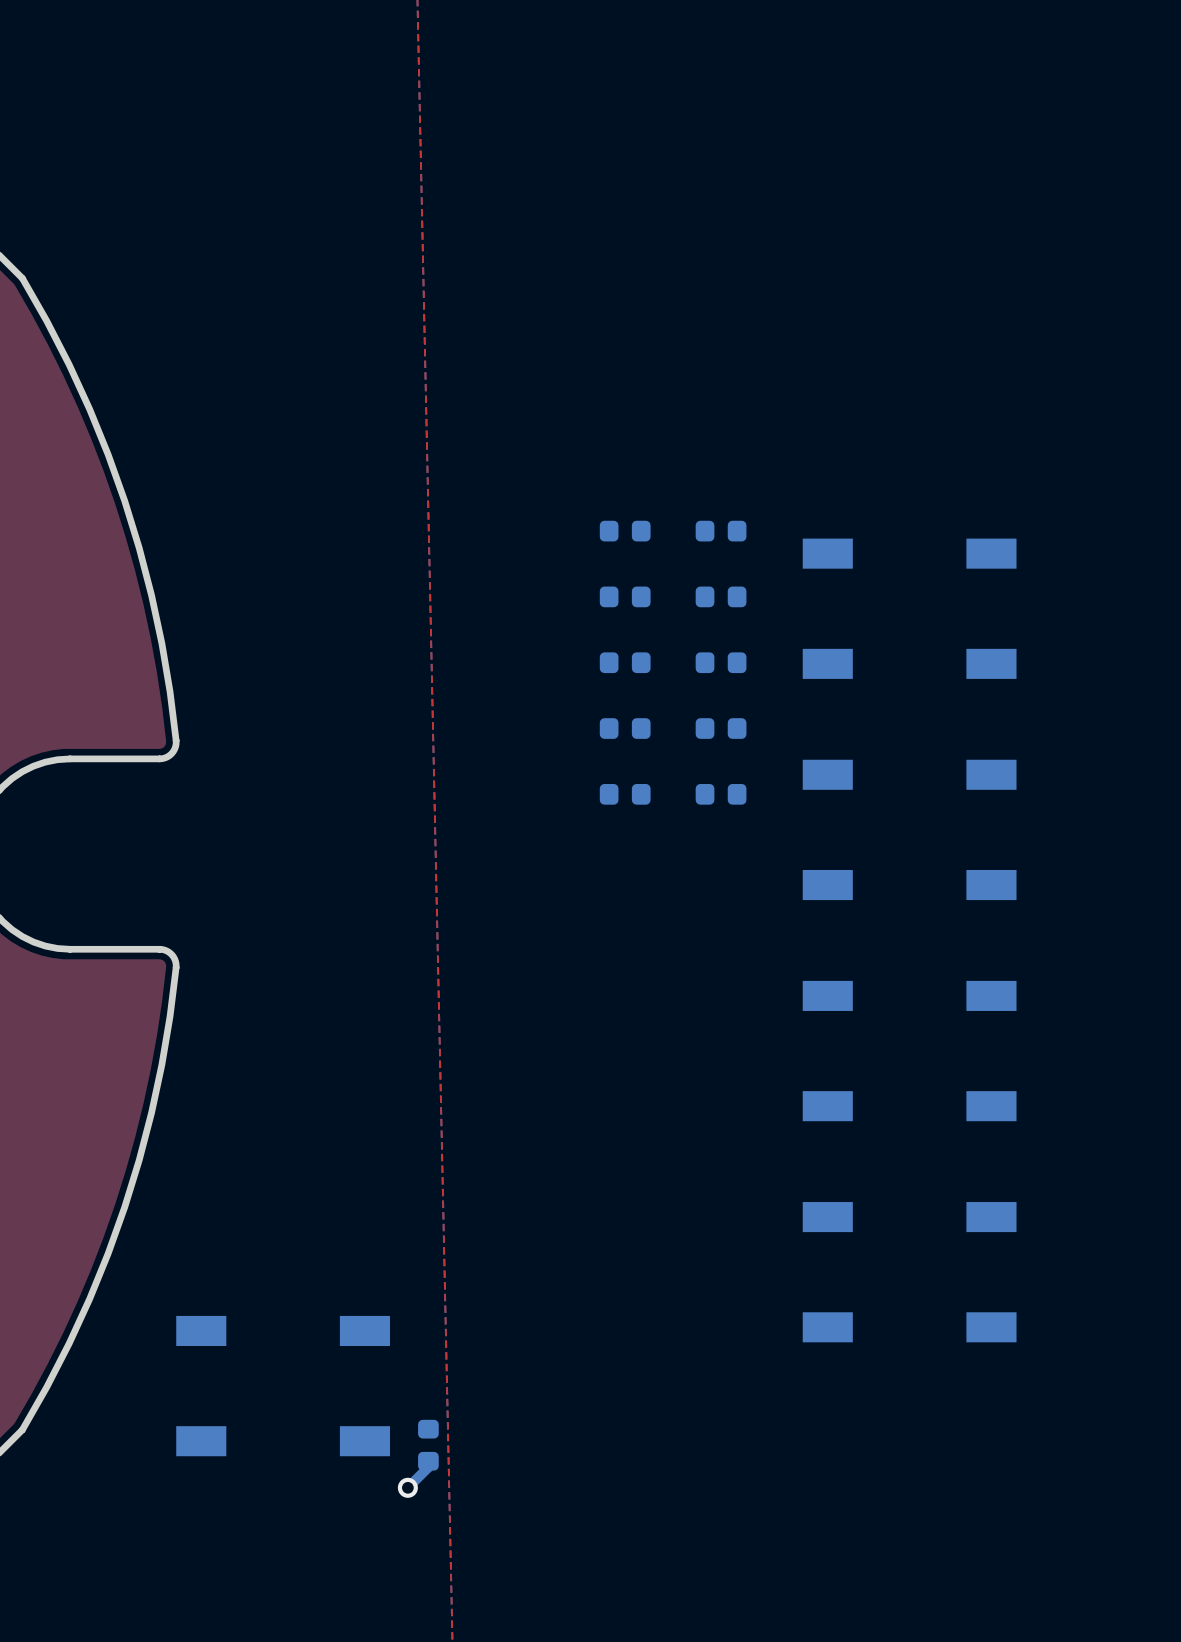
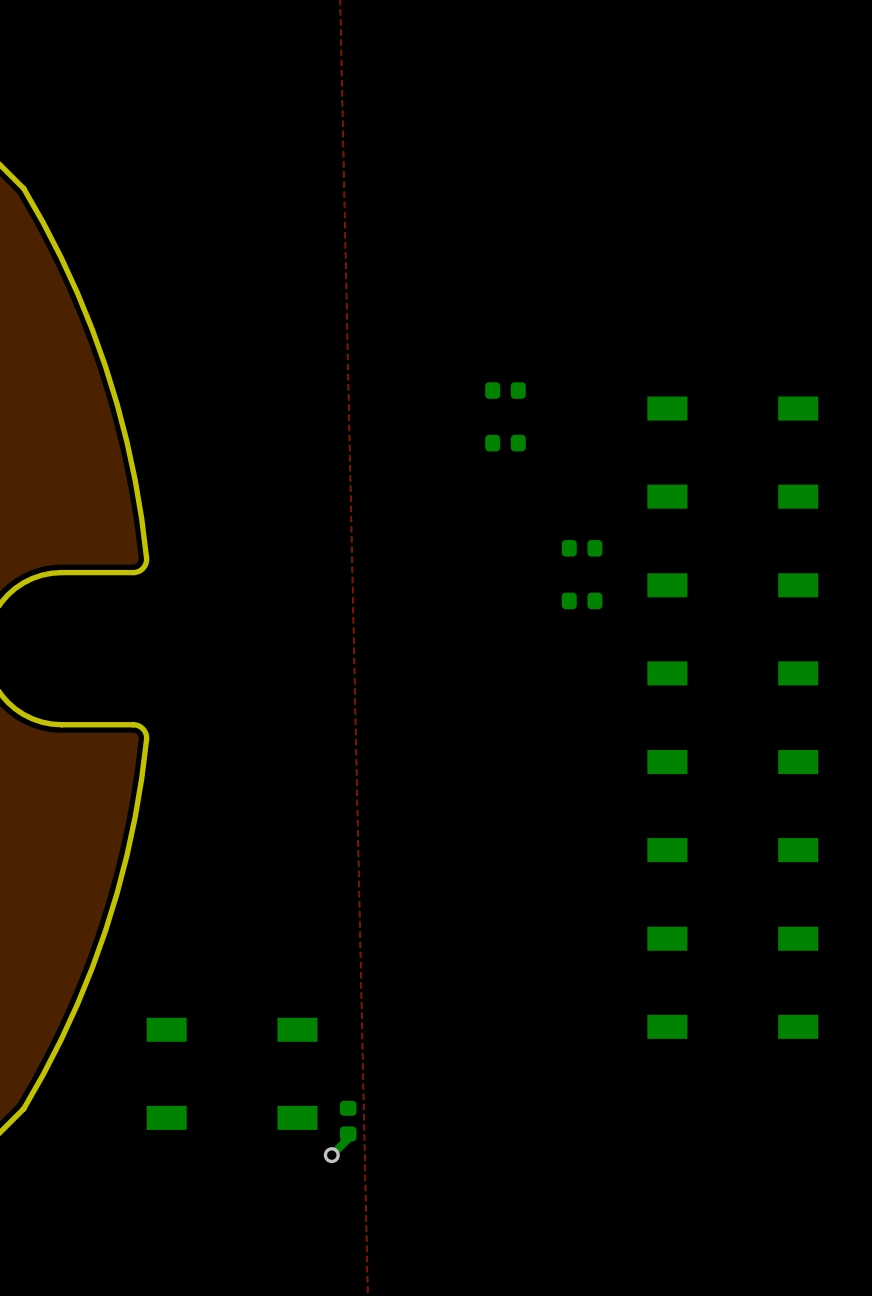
part: (721, 531) -> none
part: (721, 596) -> none
part: (625, 662) -> none
part: (721, 662) -> none
part: (625, 728) -> none
part: (625, 794) -> none

